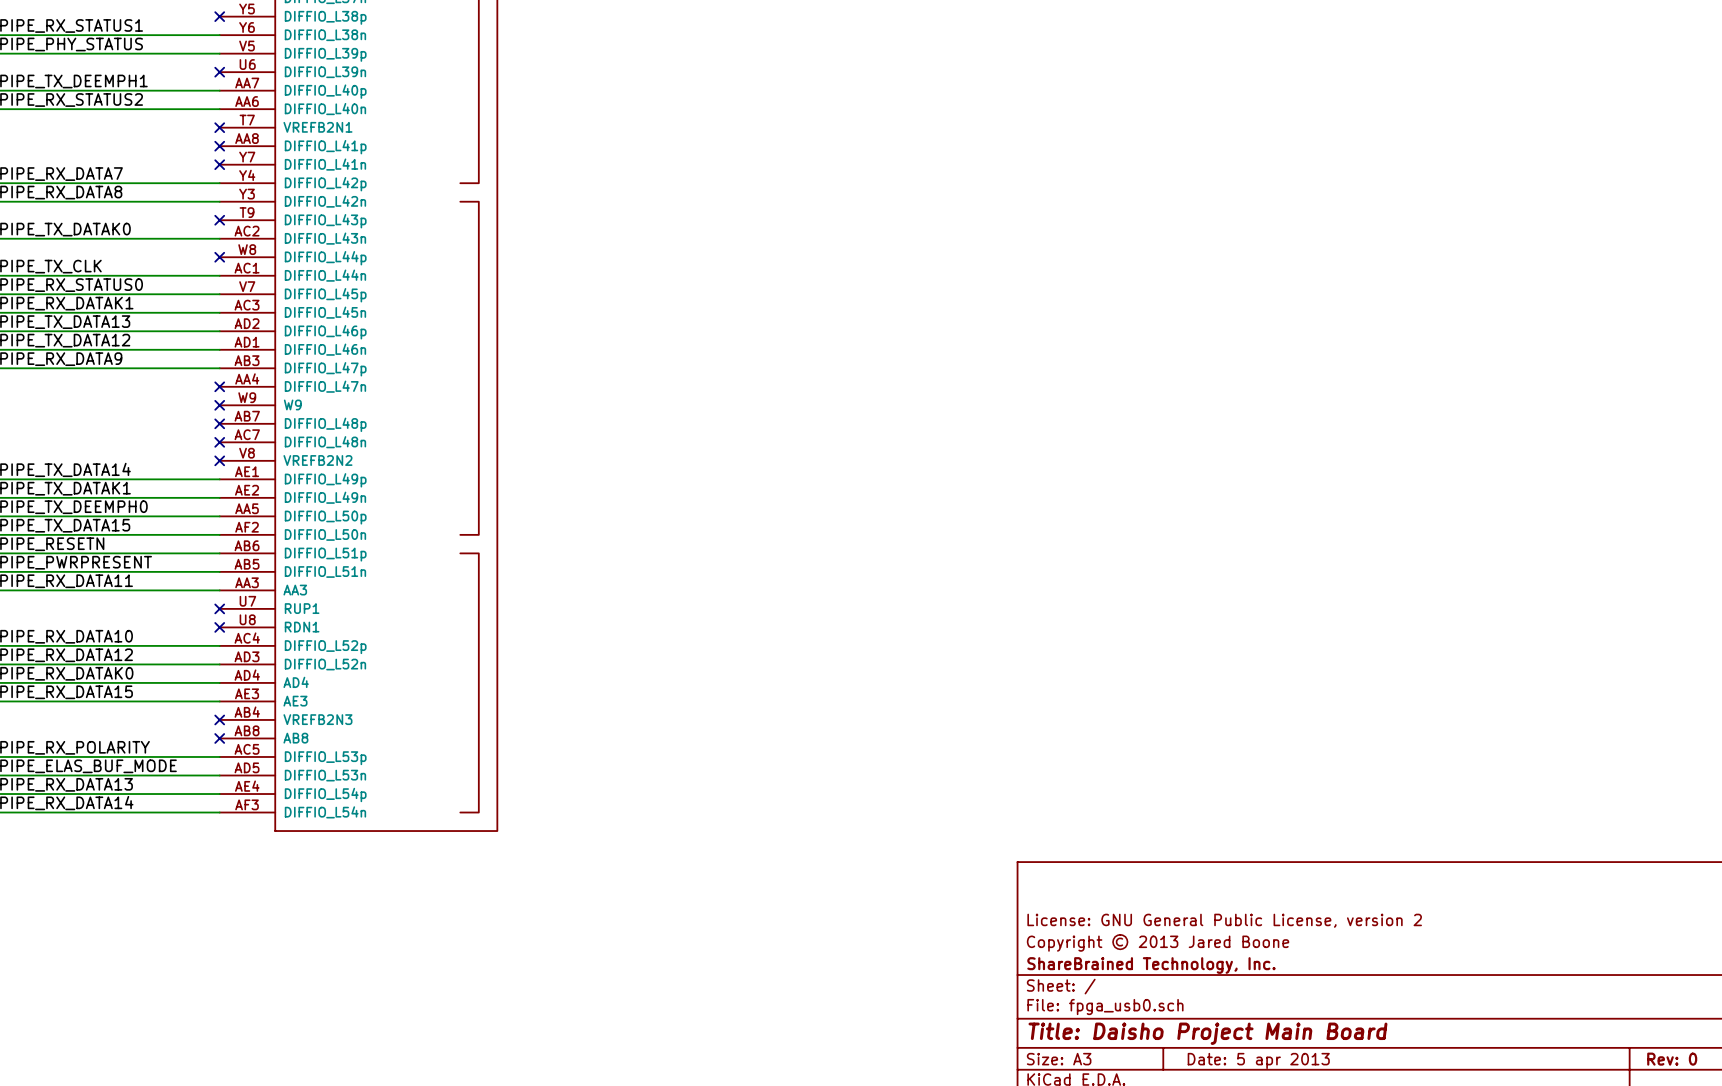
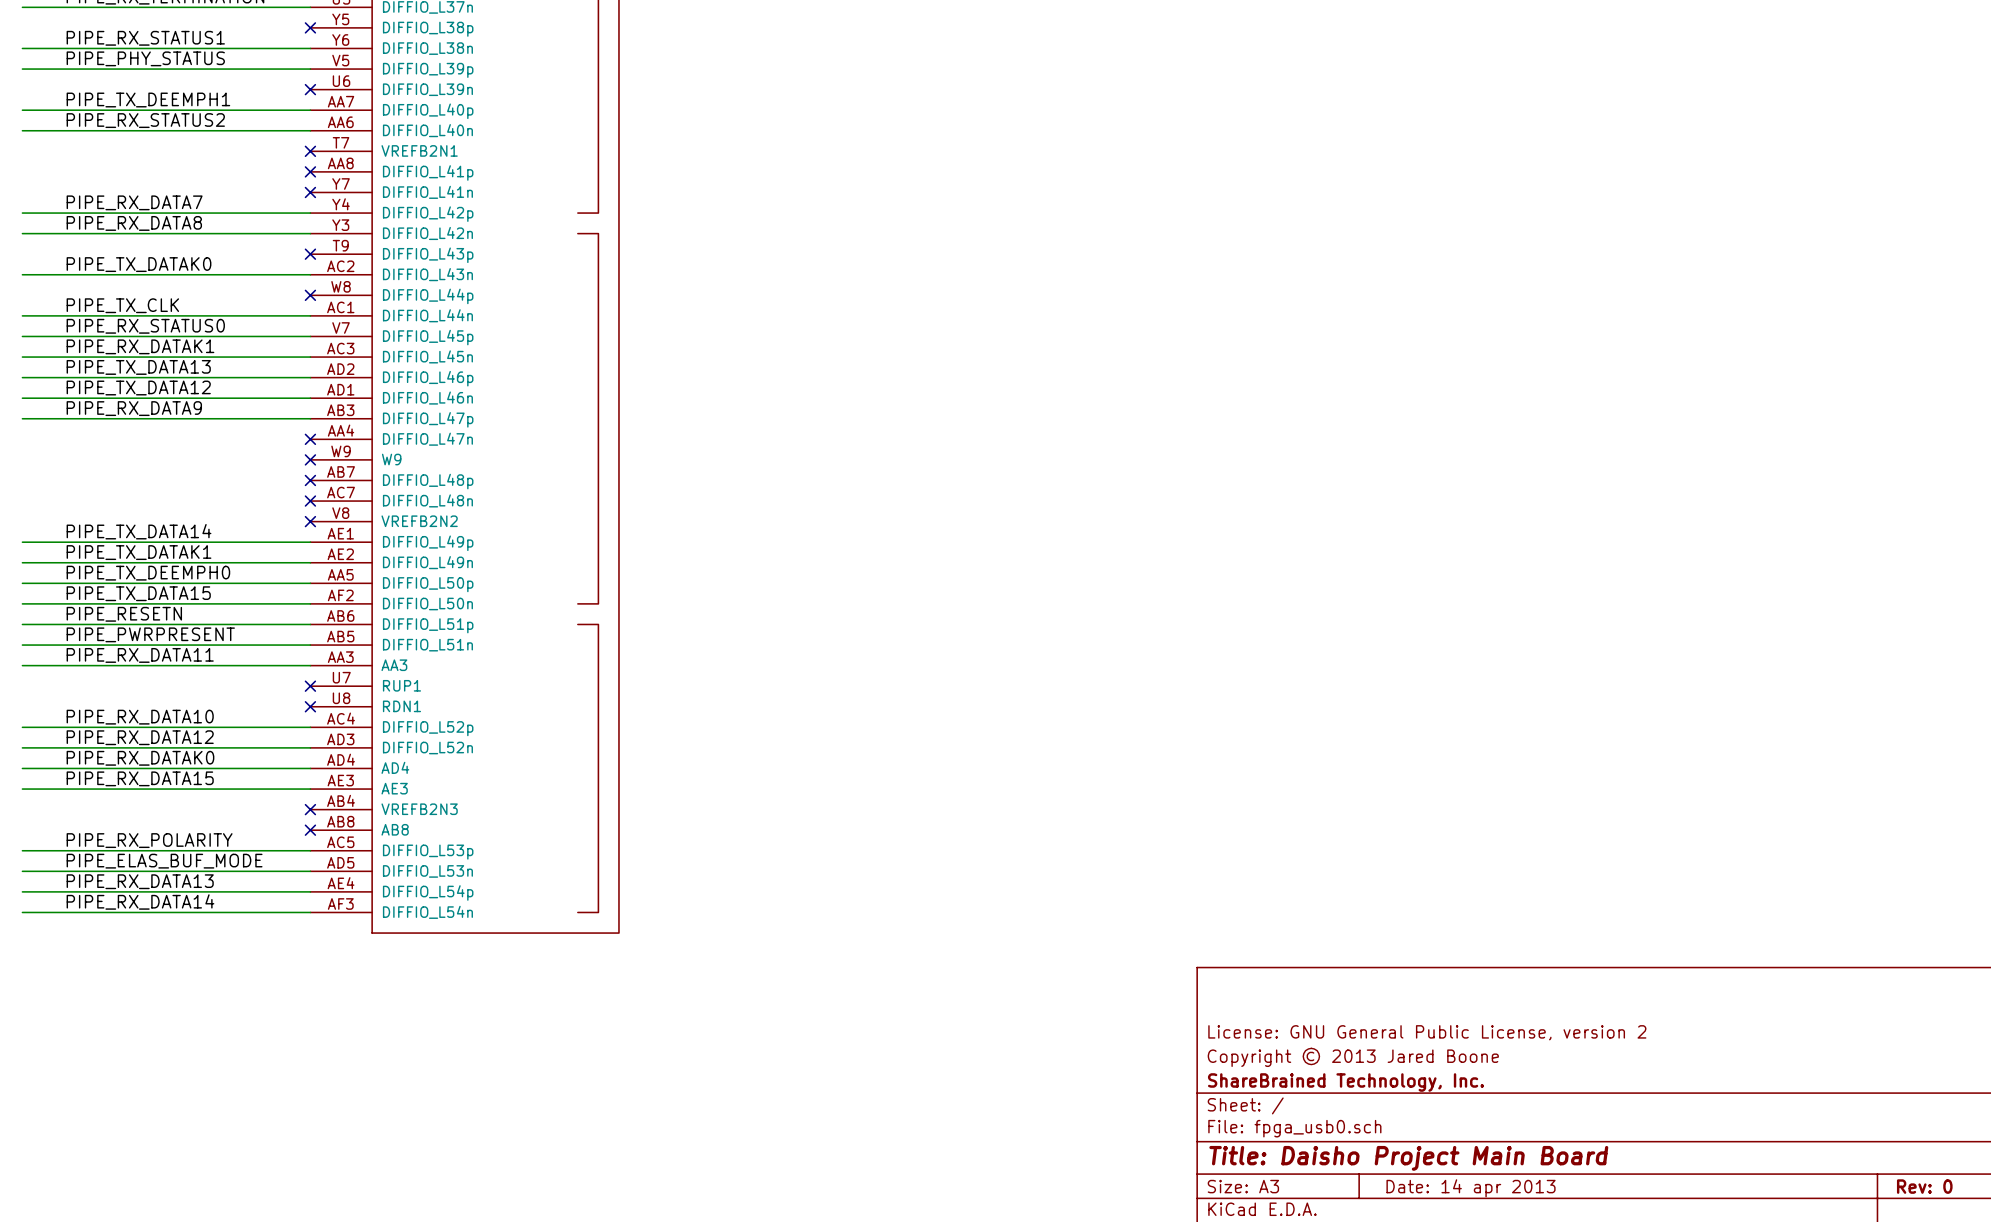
title block: Date: 5 apr 2013 (1258, 1060) -> Date: 14 apr 2013 (1471, 1188)

